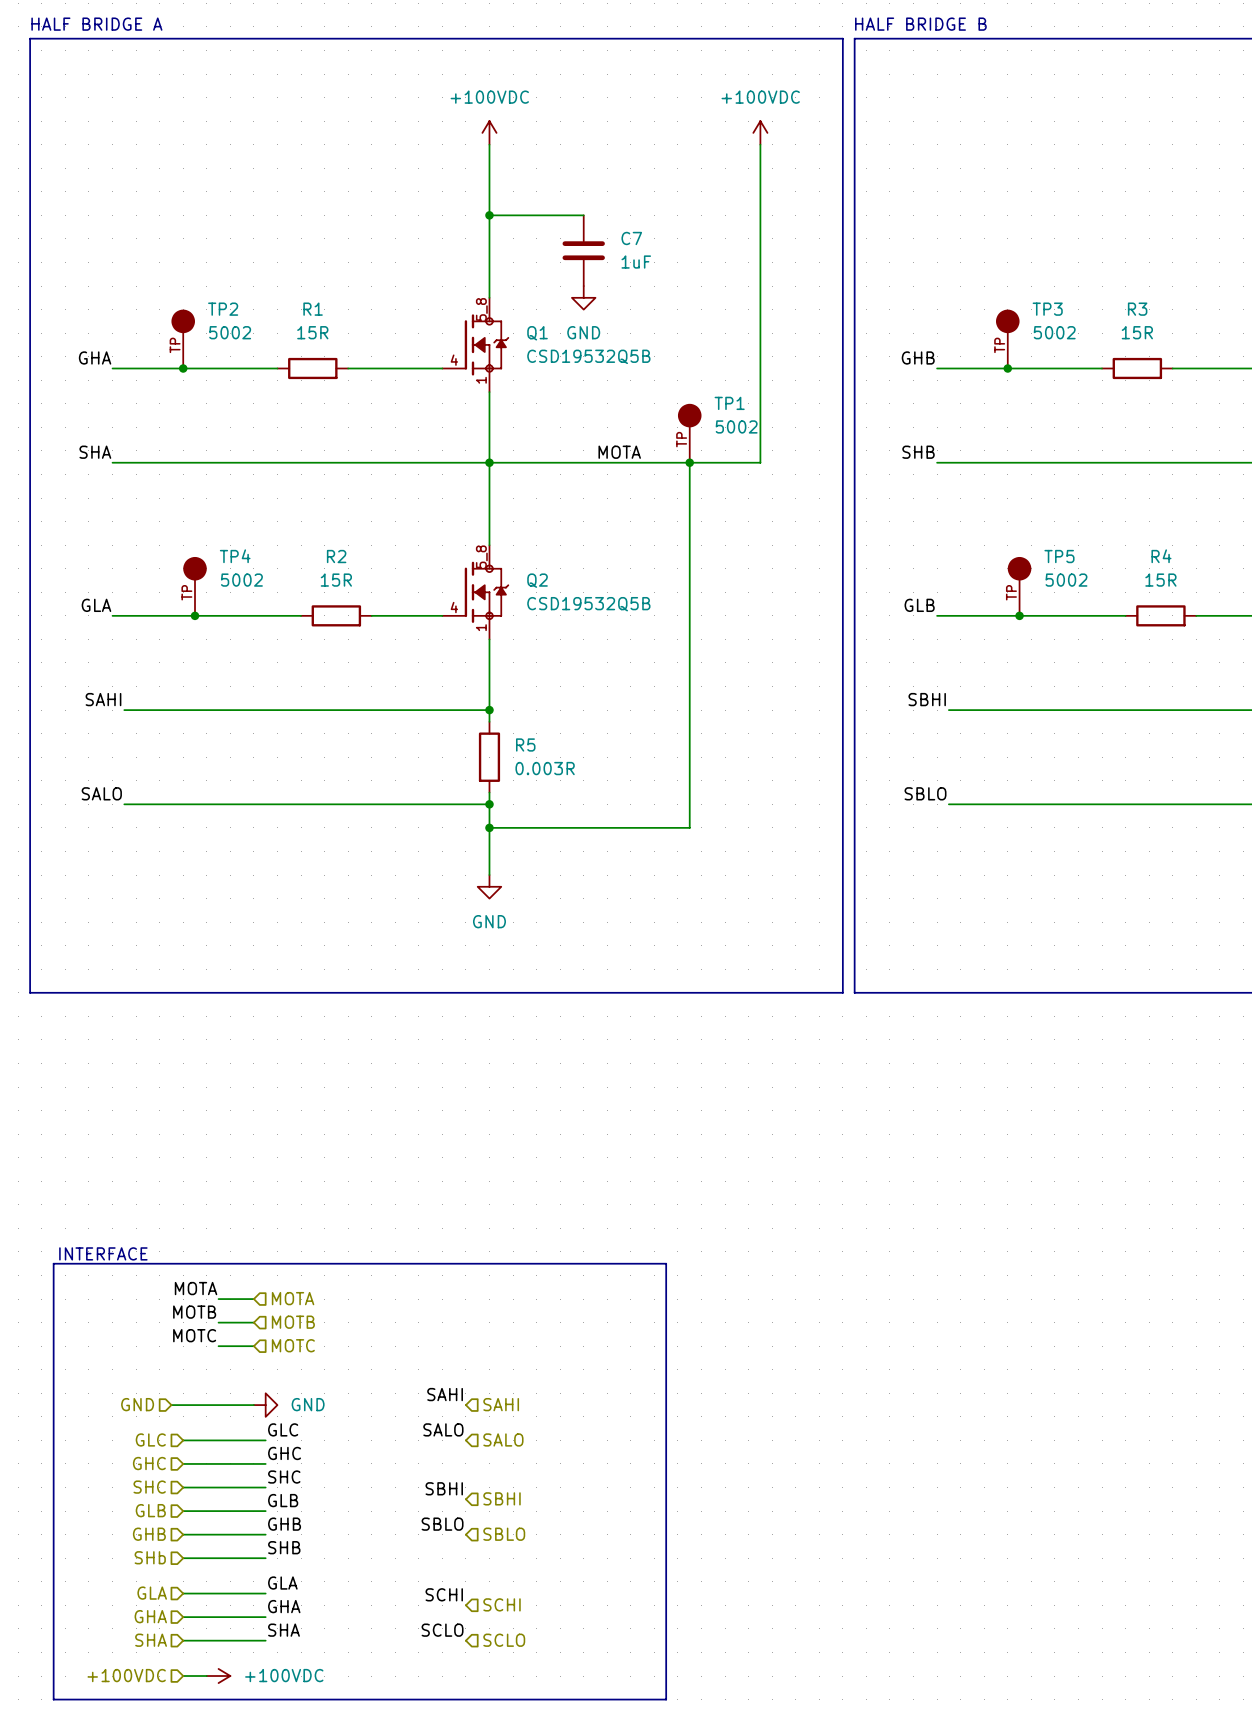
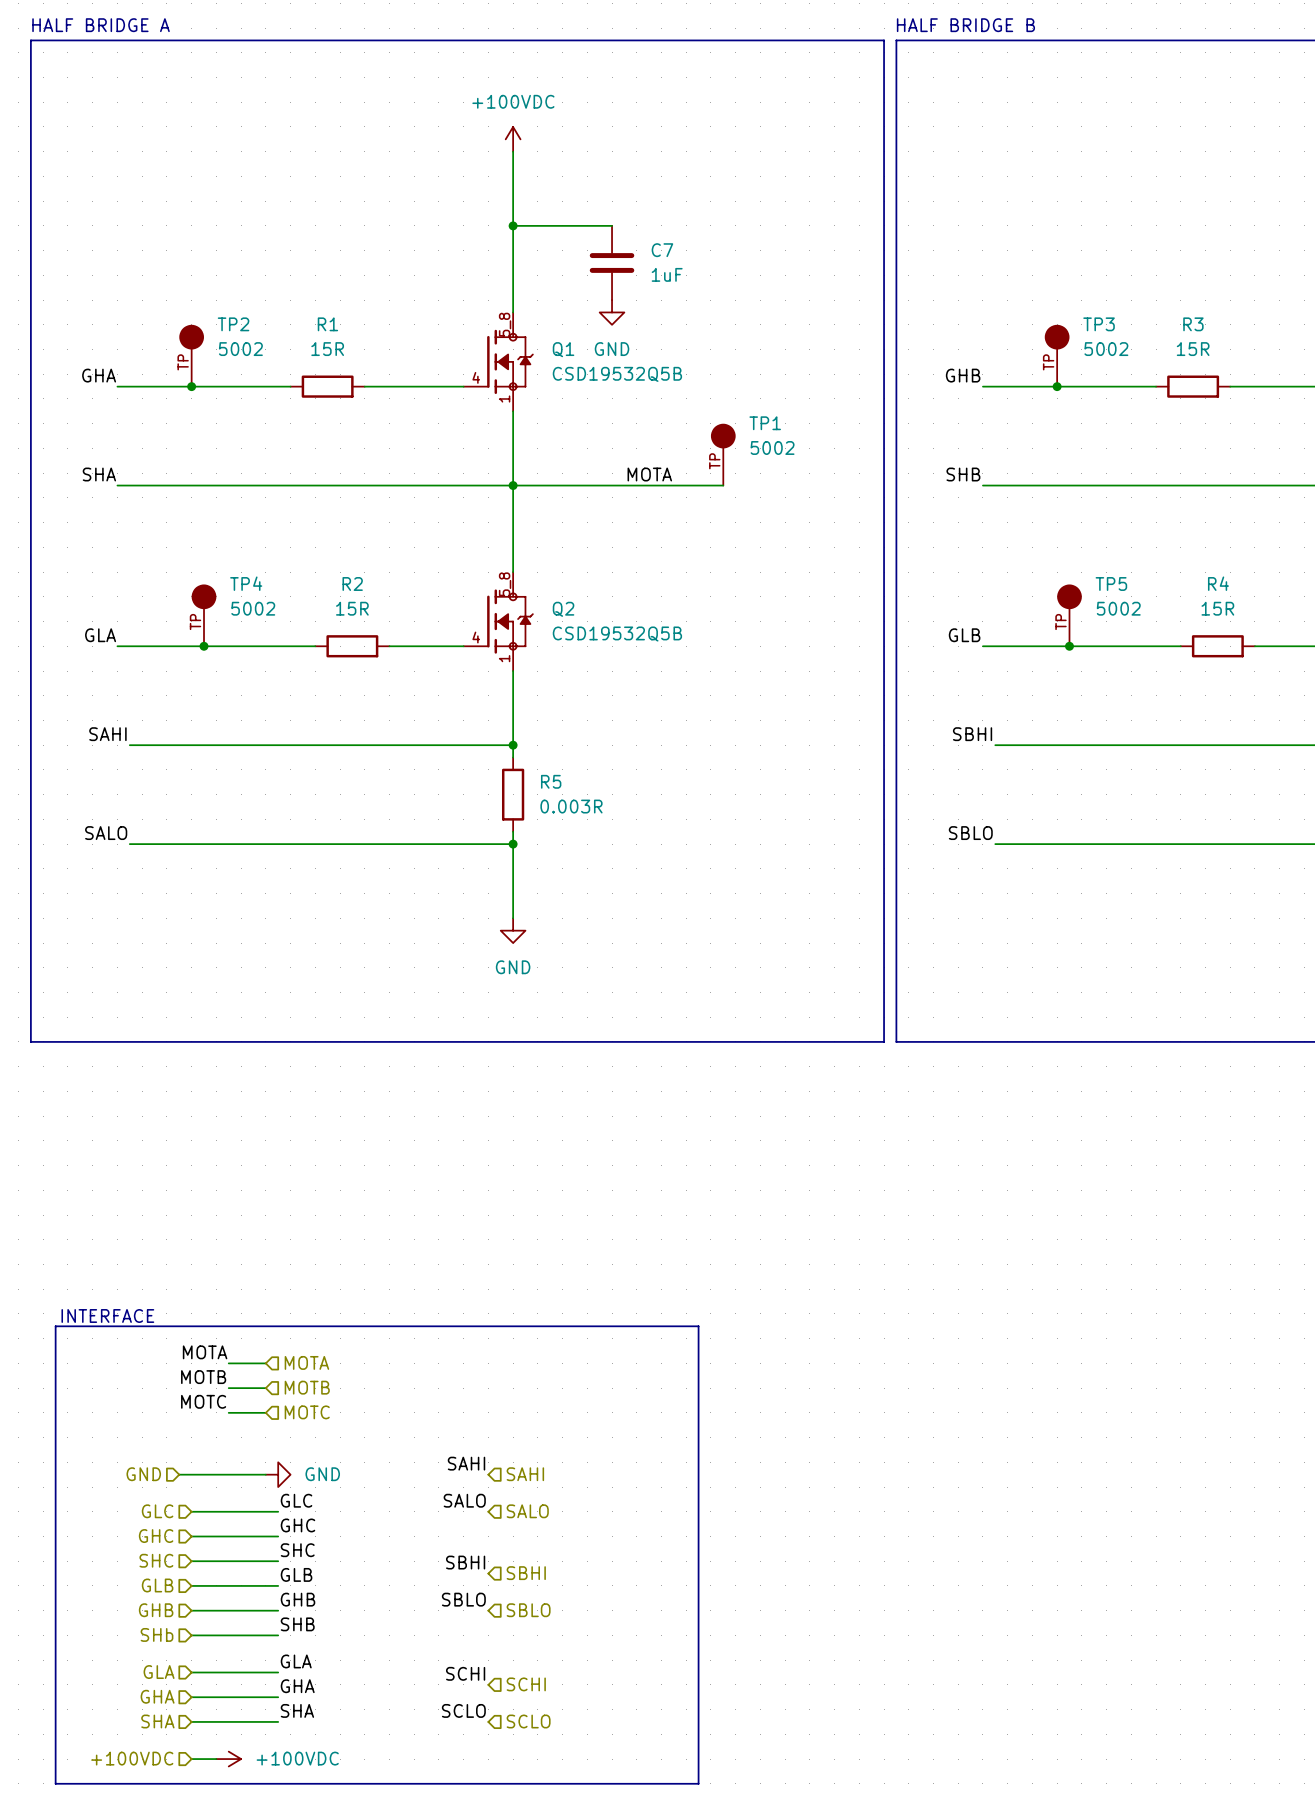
power symbol: +100VDC (760, 132) -> none
wire: (760, 144) (760, 462) (689, 462) (689, 827) (489, 827) -> none
junction: (689, 462) -> none
junction: (489, 827) -> none

